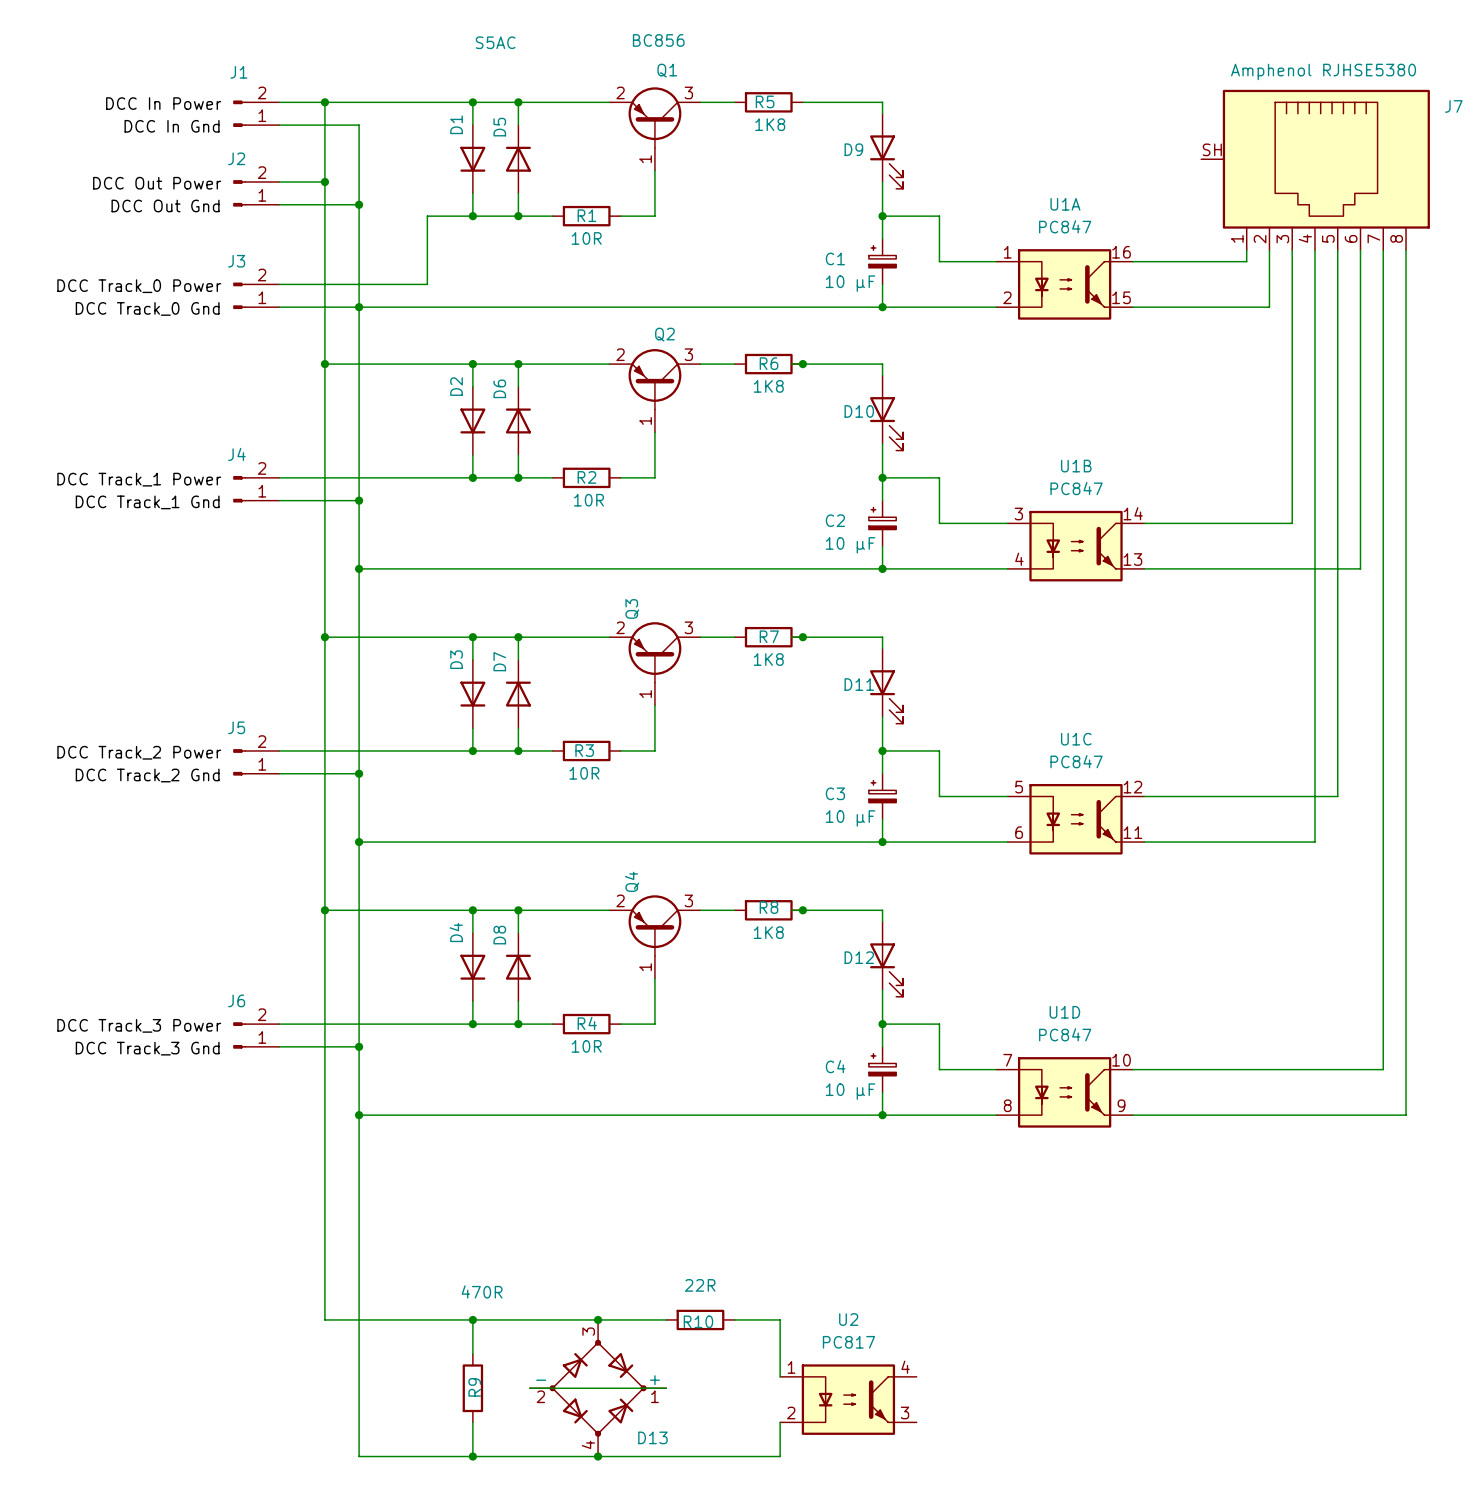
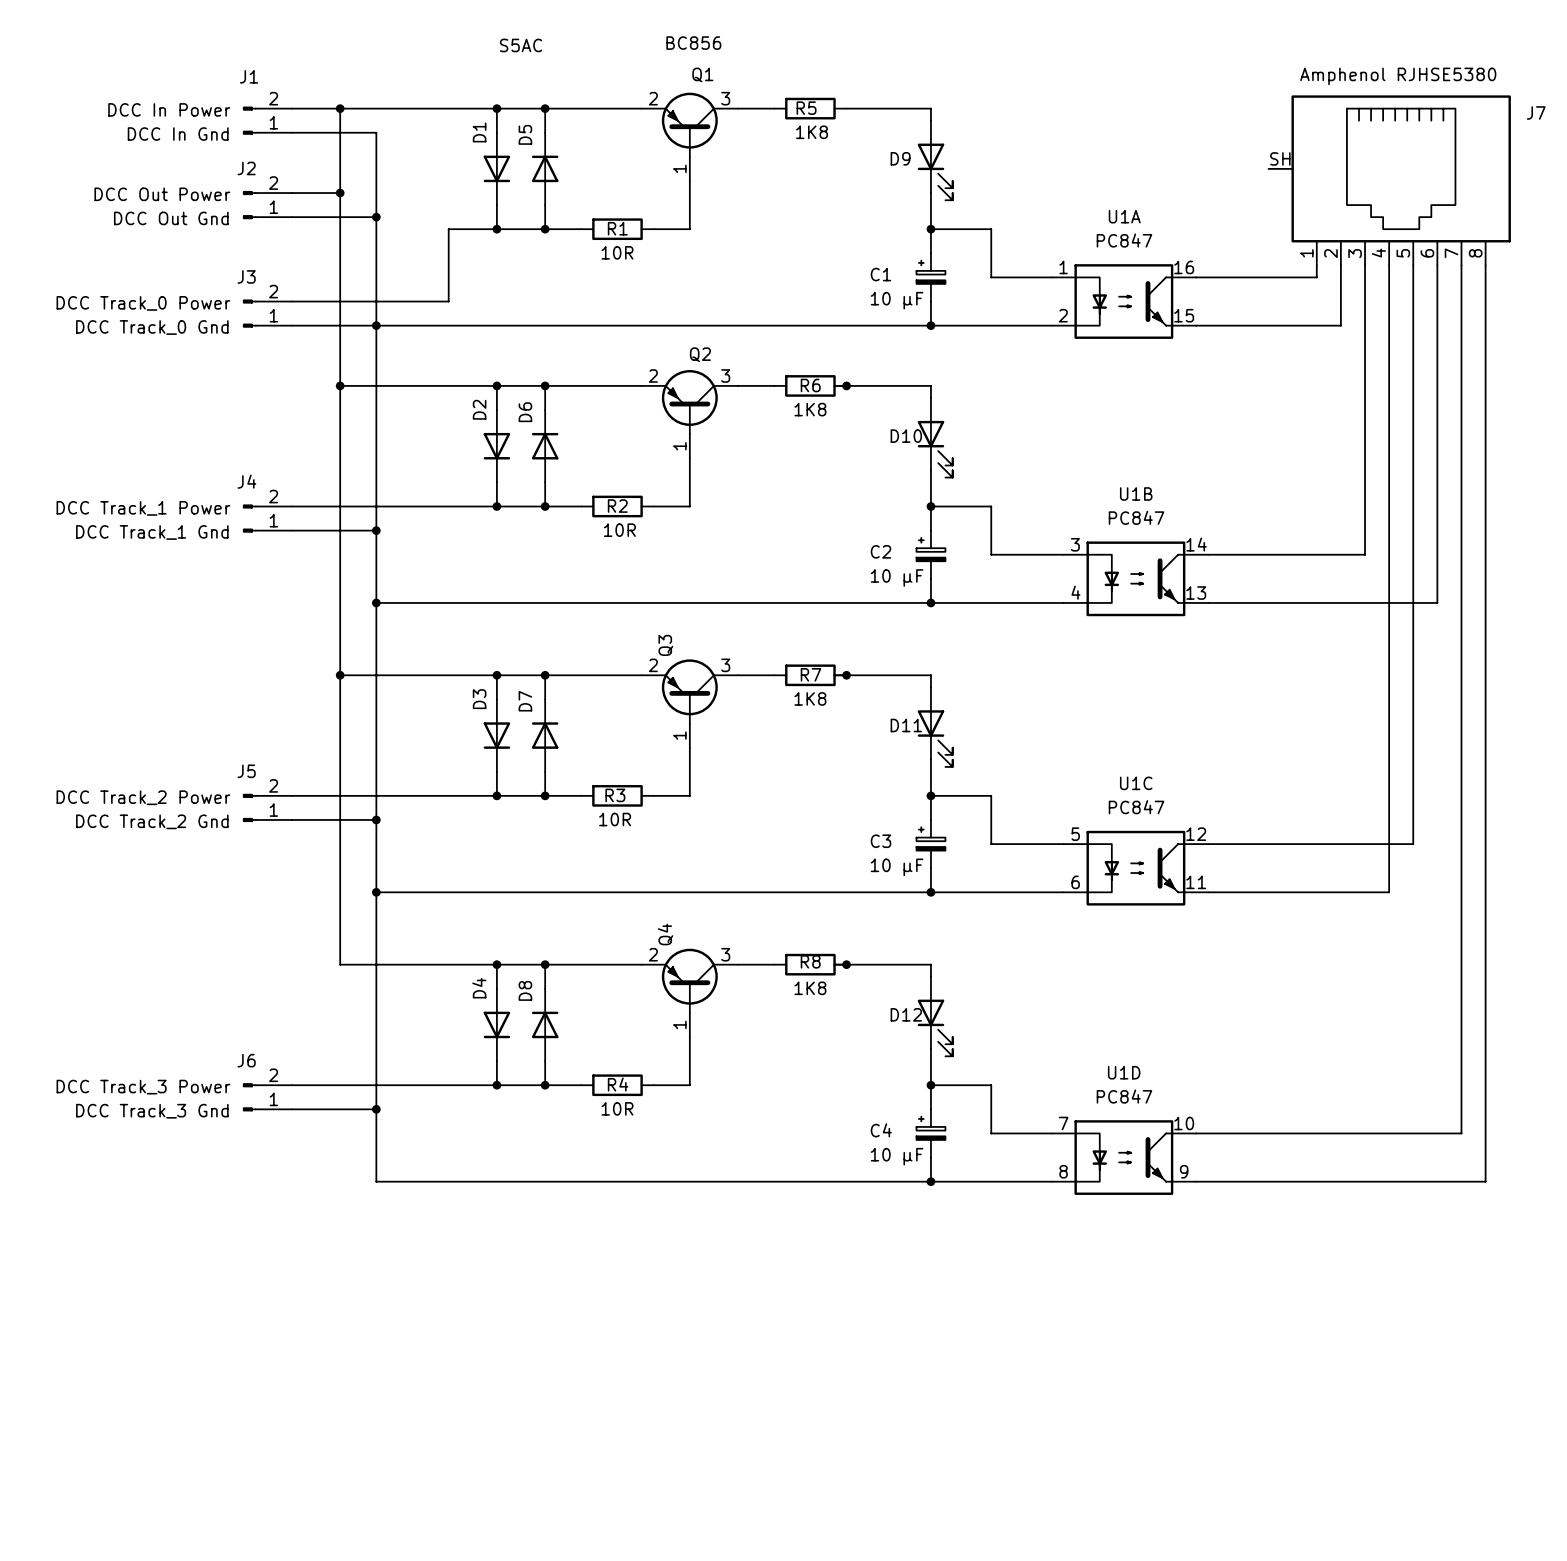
wire: (324, 910) (324, 1319) (666, 1319) -> none
junction: (324, 910) -> none
wire: (359, 1115) (359, 1456) (780, 1456) (780, 1422) -> none
junction: (359, 1115) -> none
wire: (472, 1319) (472, 1354) -> none
junction: (472, 1319) -> none
junction: (598, 1319) -> none
R10: 22R (700, 1319) -> none
wire: (734, 1319) (780, 1319) (780, 1376) -> none
R9: 470R (472, 1388) -> none
wire: (529, 1388) (666, 1388) -> none
D13: (598, 1388) -> none
U2: PC817 (848, 1399) -> none
wire: (472, 1422) (472, 1456) -> none
junction: (472, 1456) -> none
junction: (598, 1456) -> none

